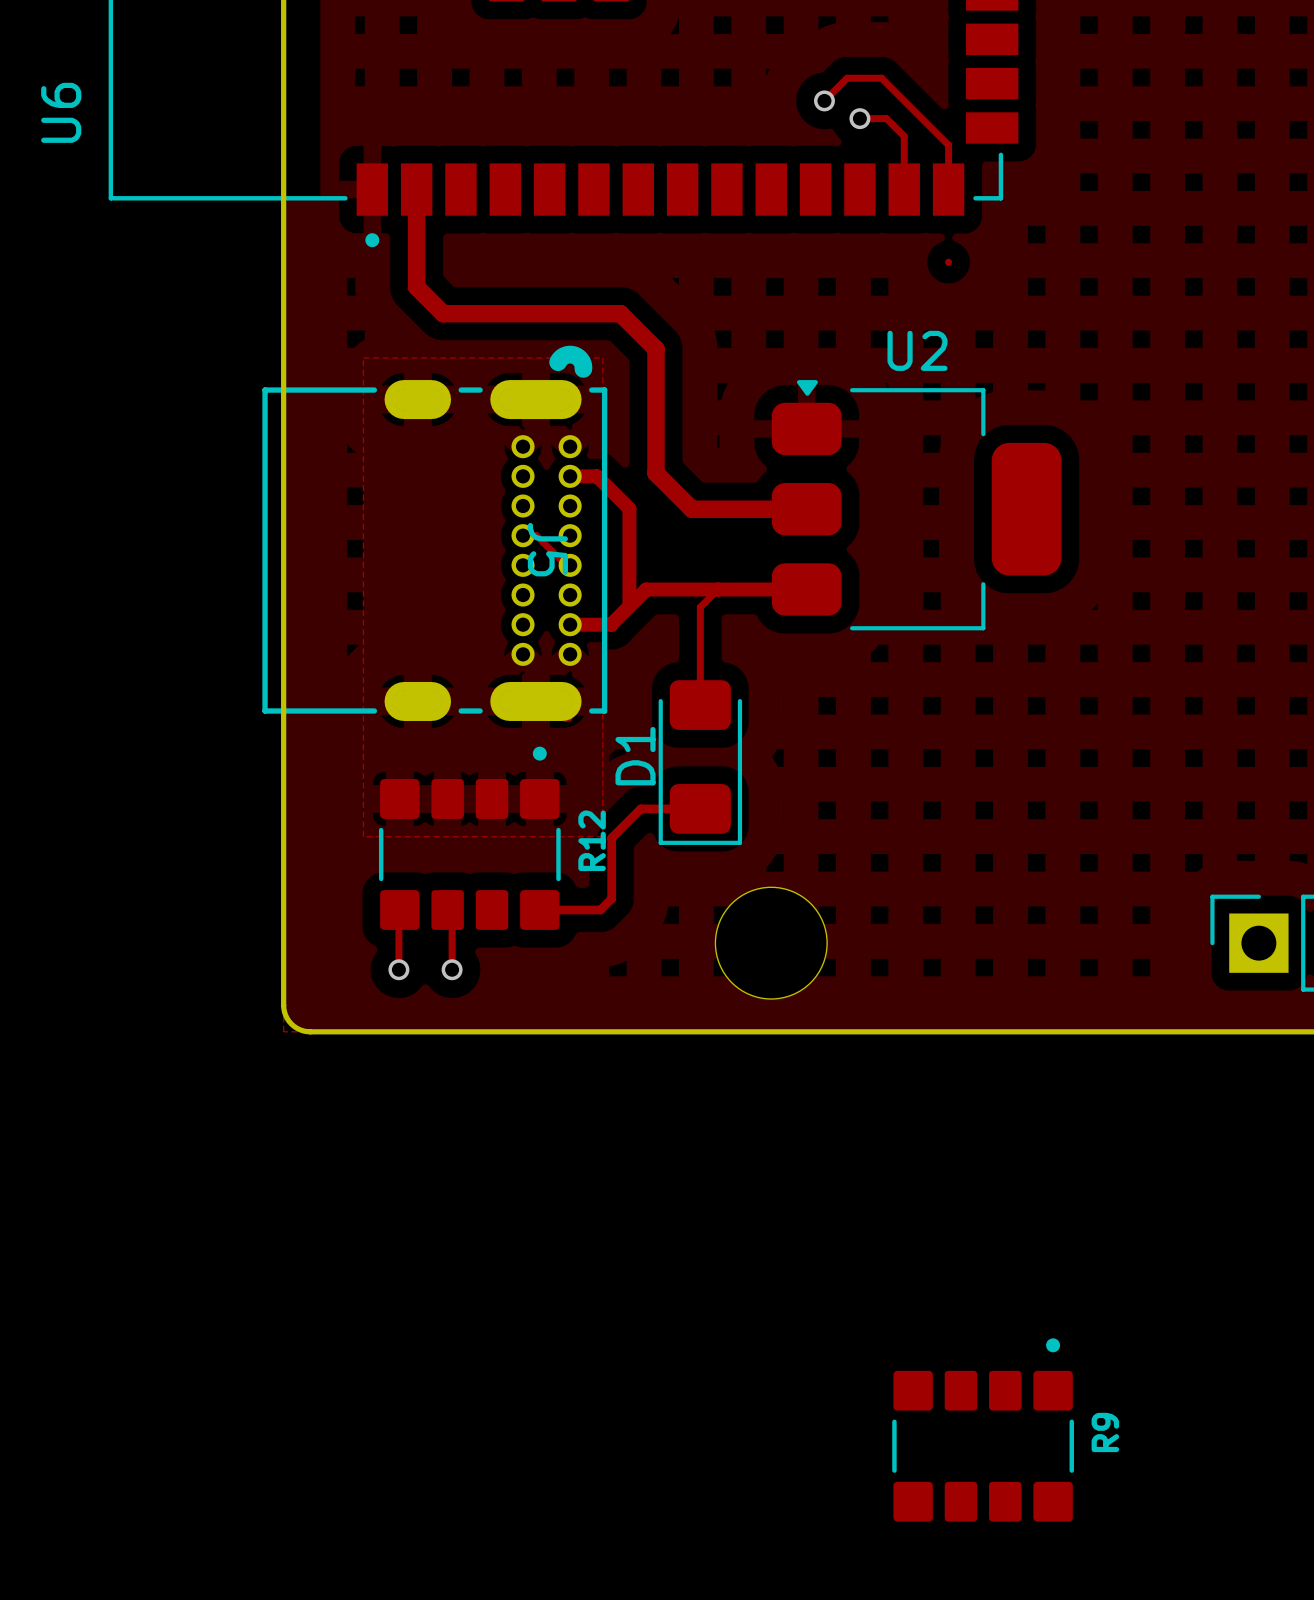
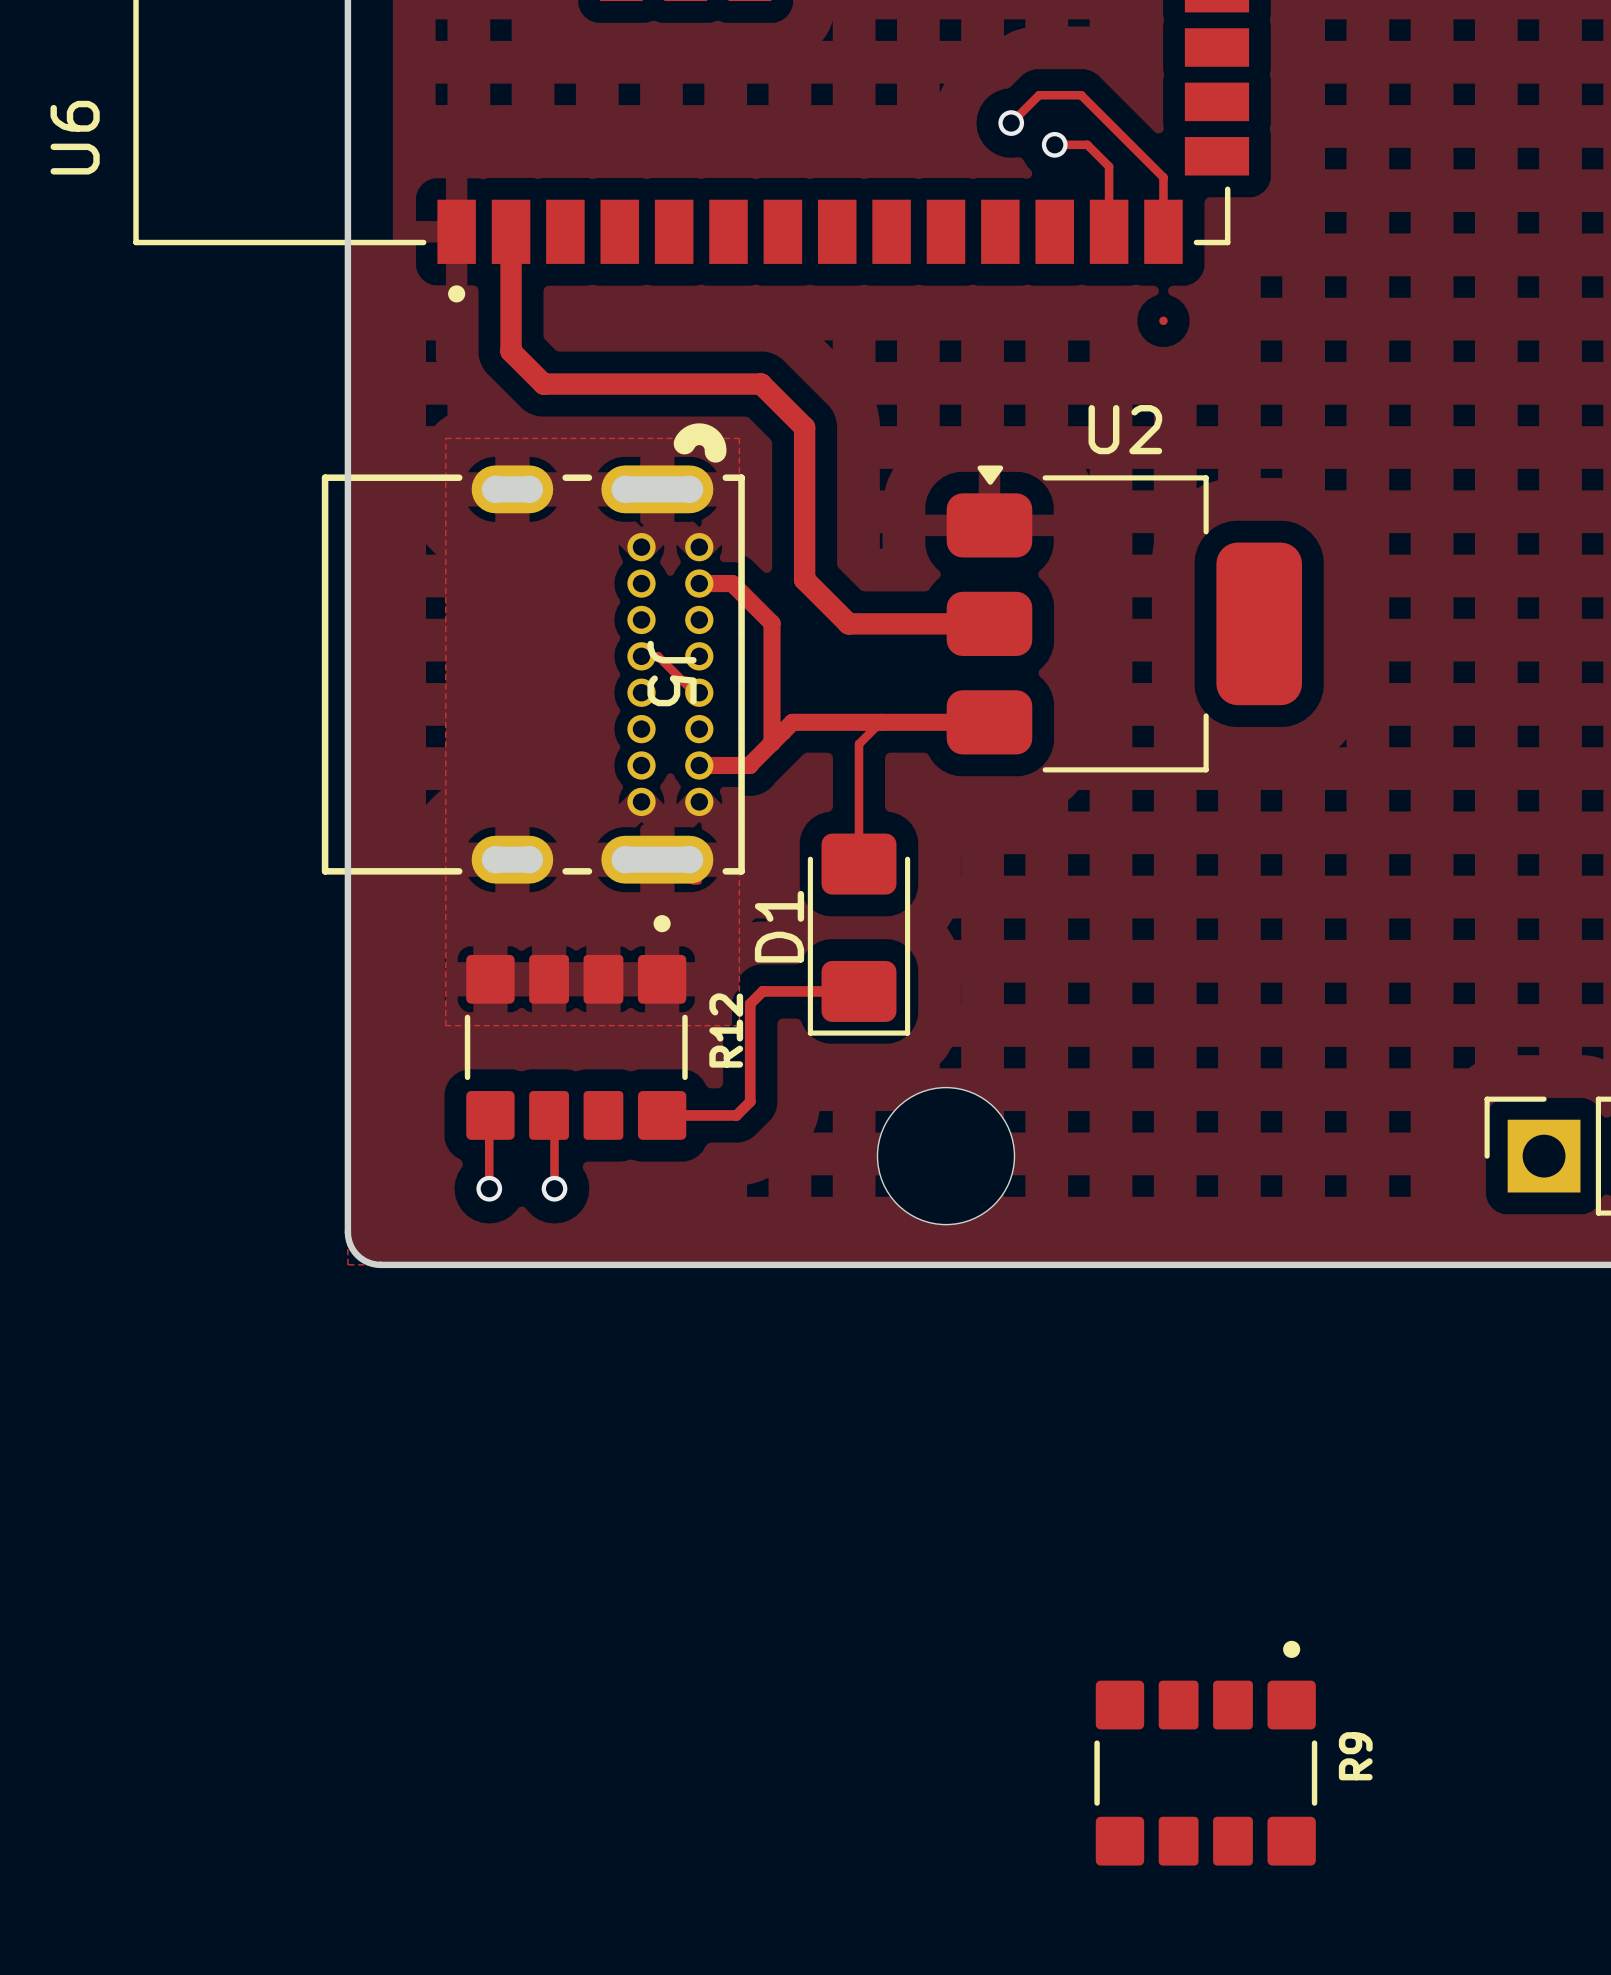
track: (640, 808) (611, 838) -> (786, 991) (762, 991) (750, 1003) (750, 1027)

